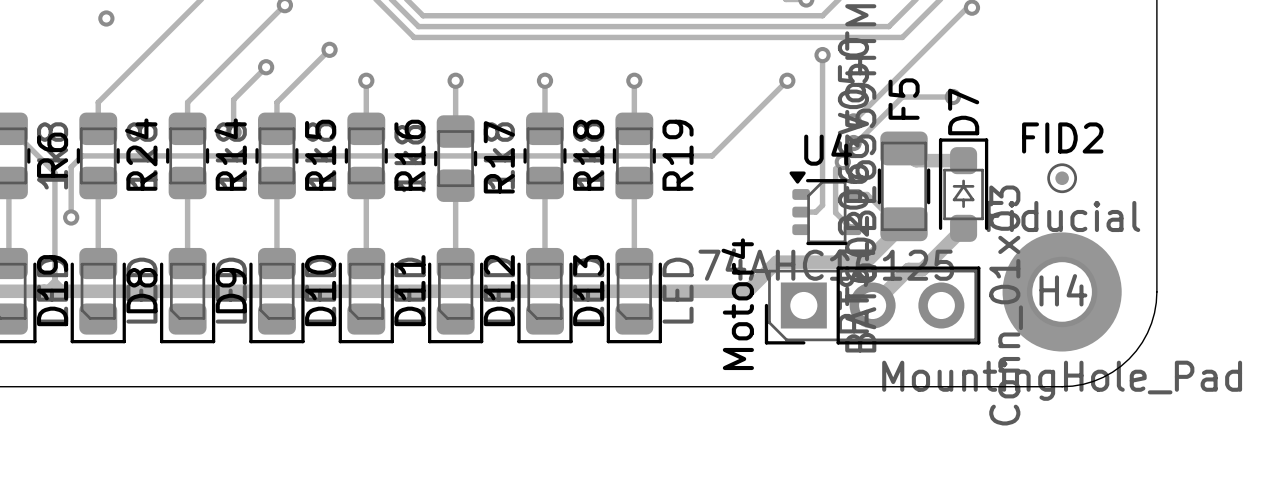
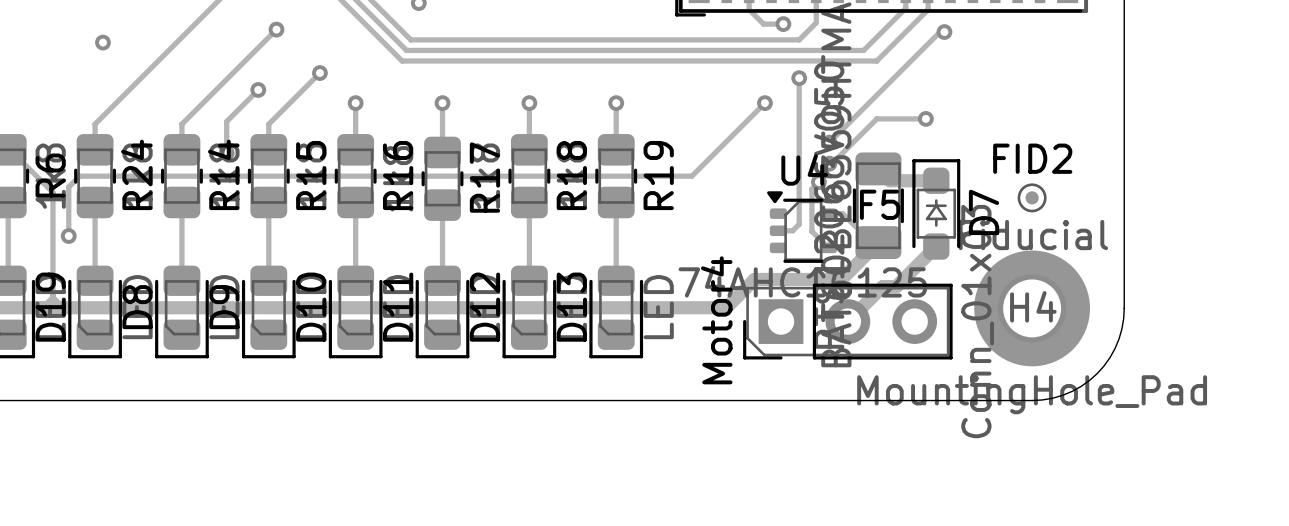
F5 name rotation: 0° (904, 99) -> 90° clockwise (880, 204)
F5 name position: F5 (904, 99) -> F5 (880, 204)
D7 name position: D7 (963, 111) -> D7 (984, 212)

